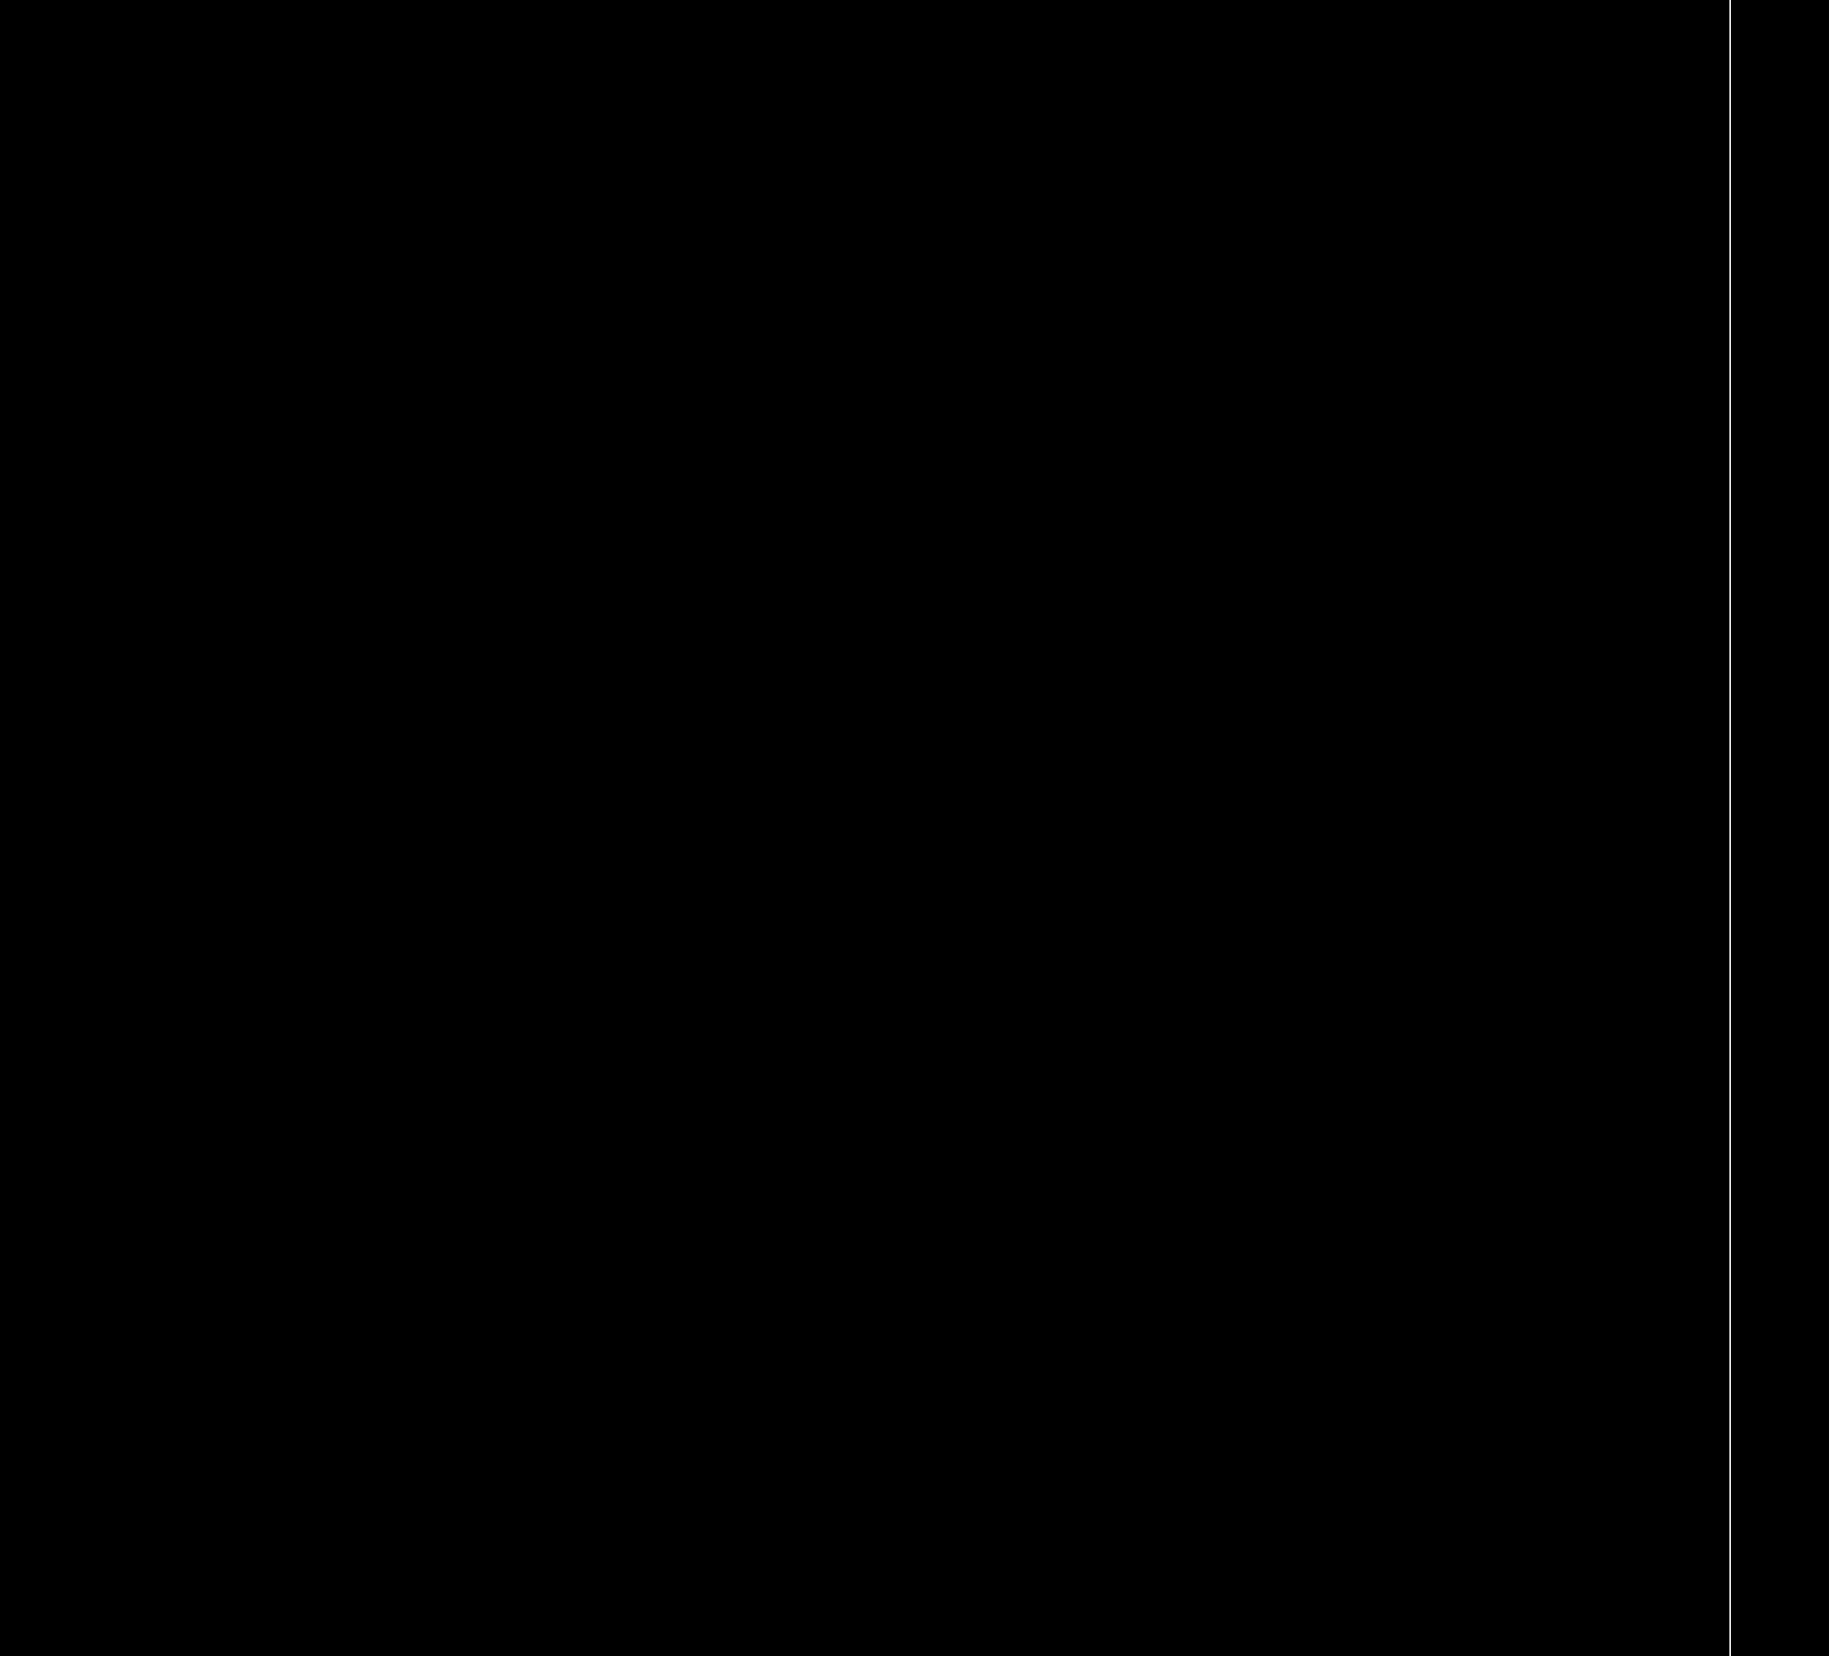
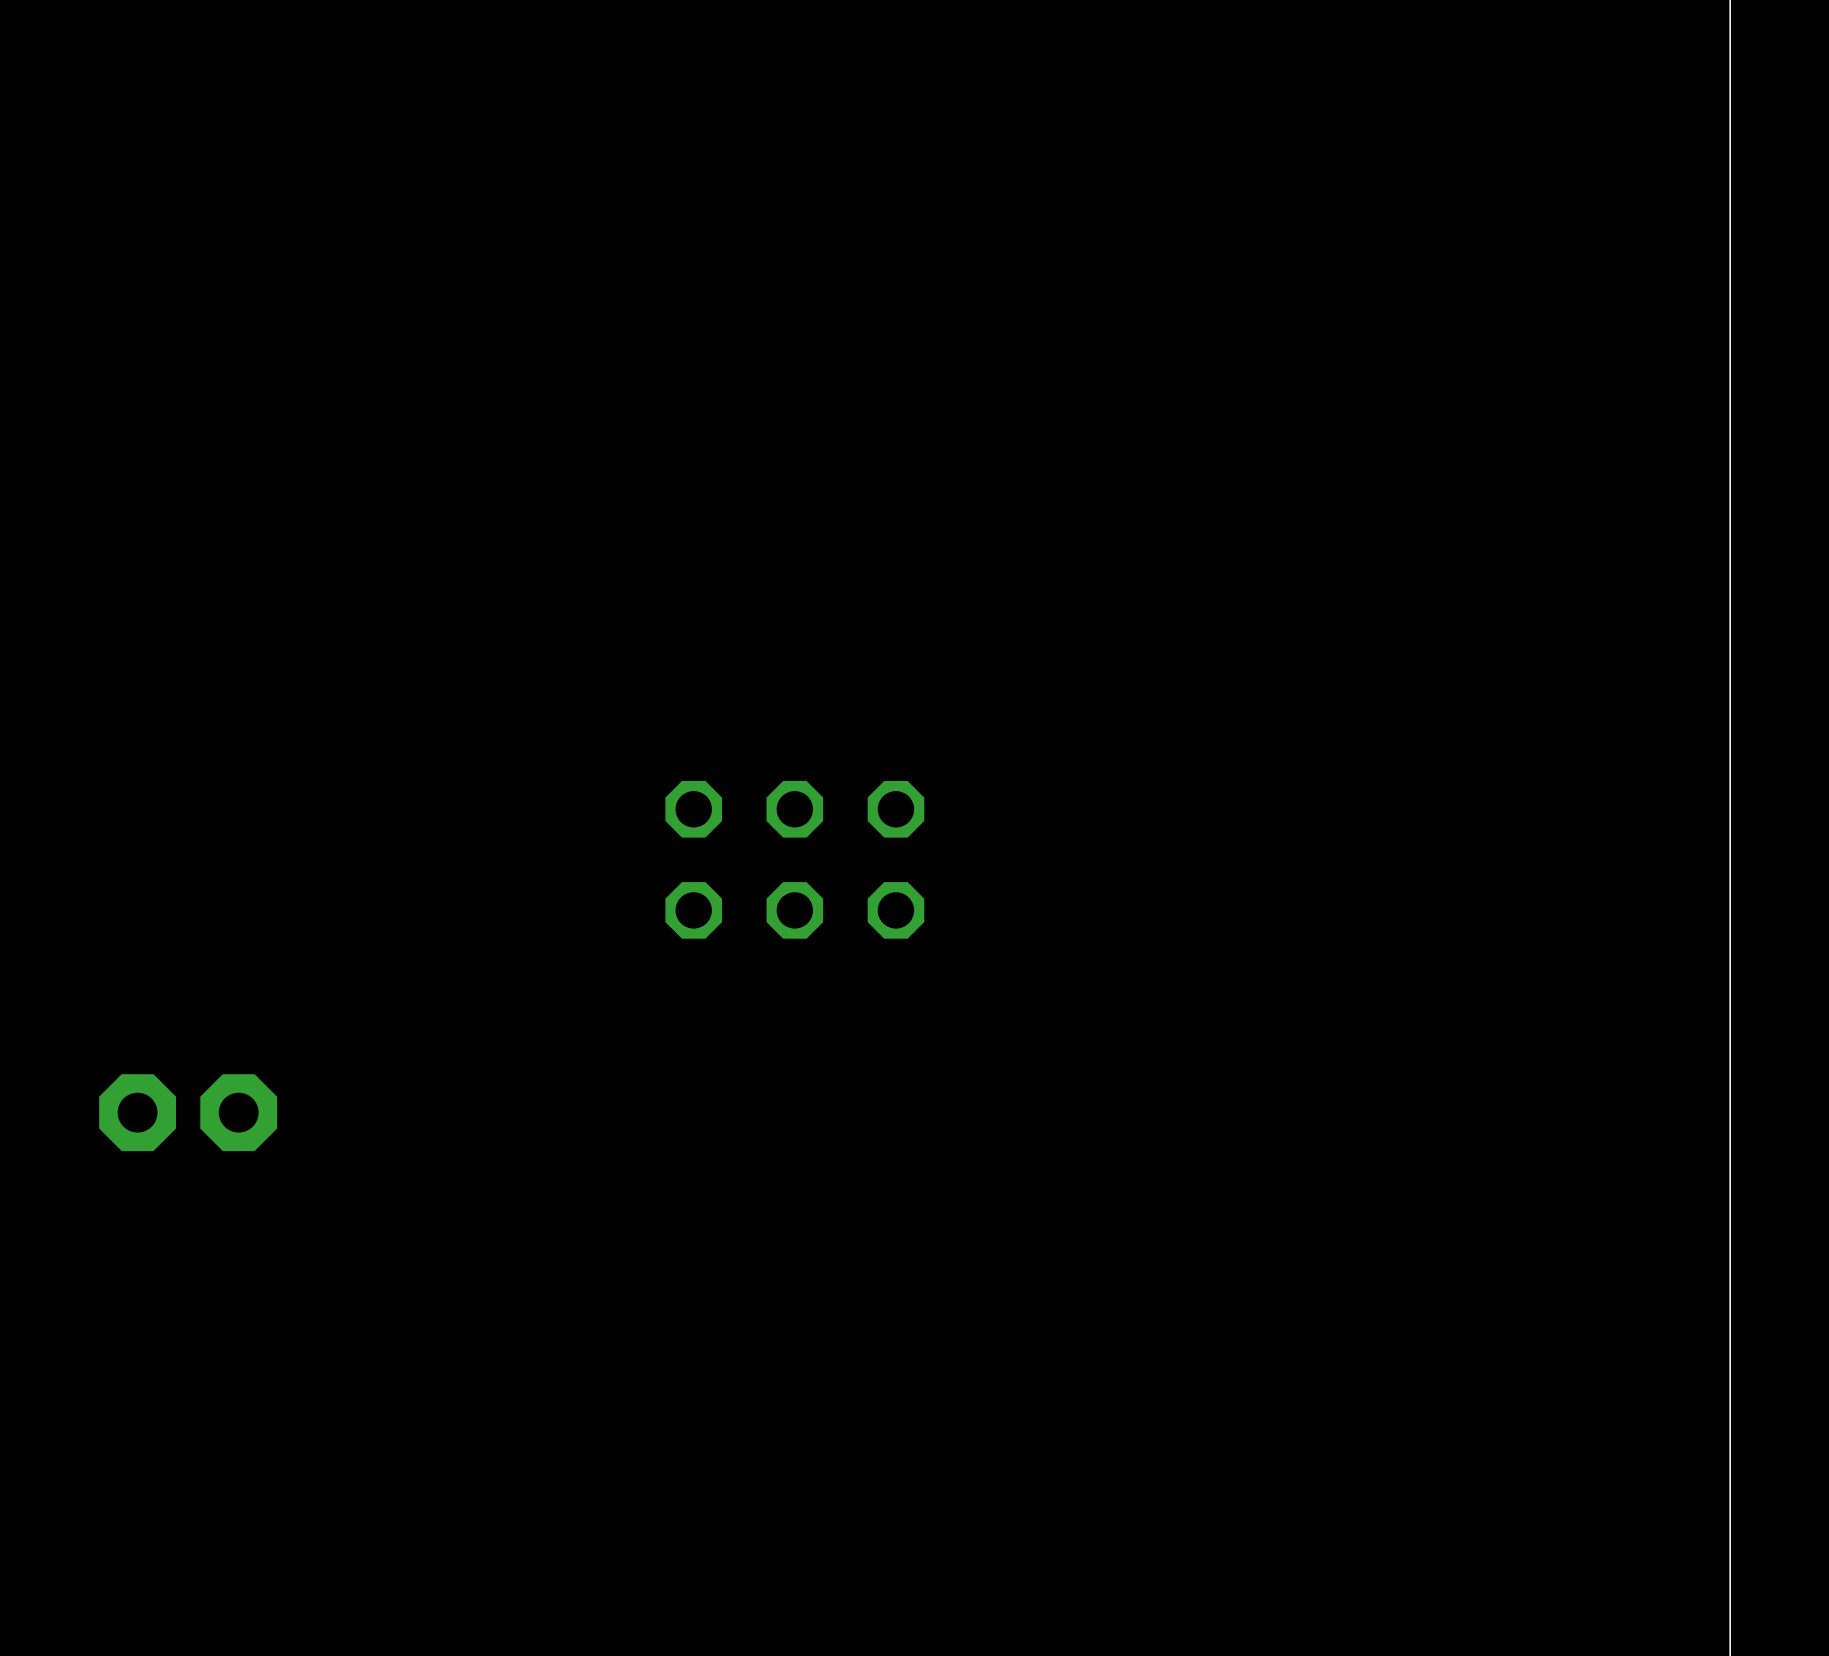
part: none -> (794, 859)
part: none -> (188, 1112)

